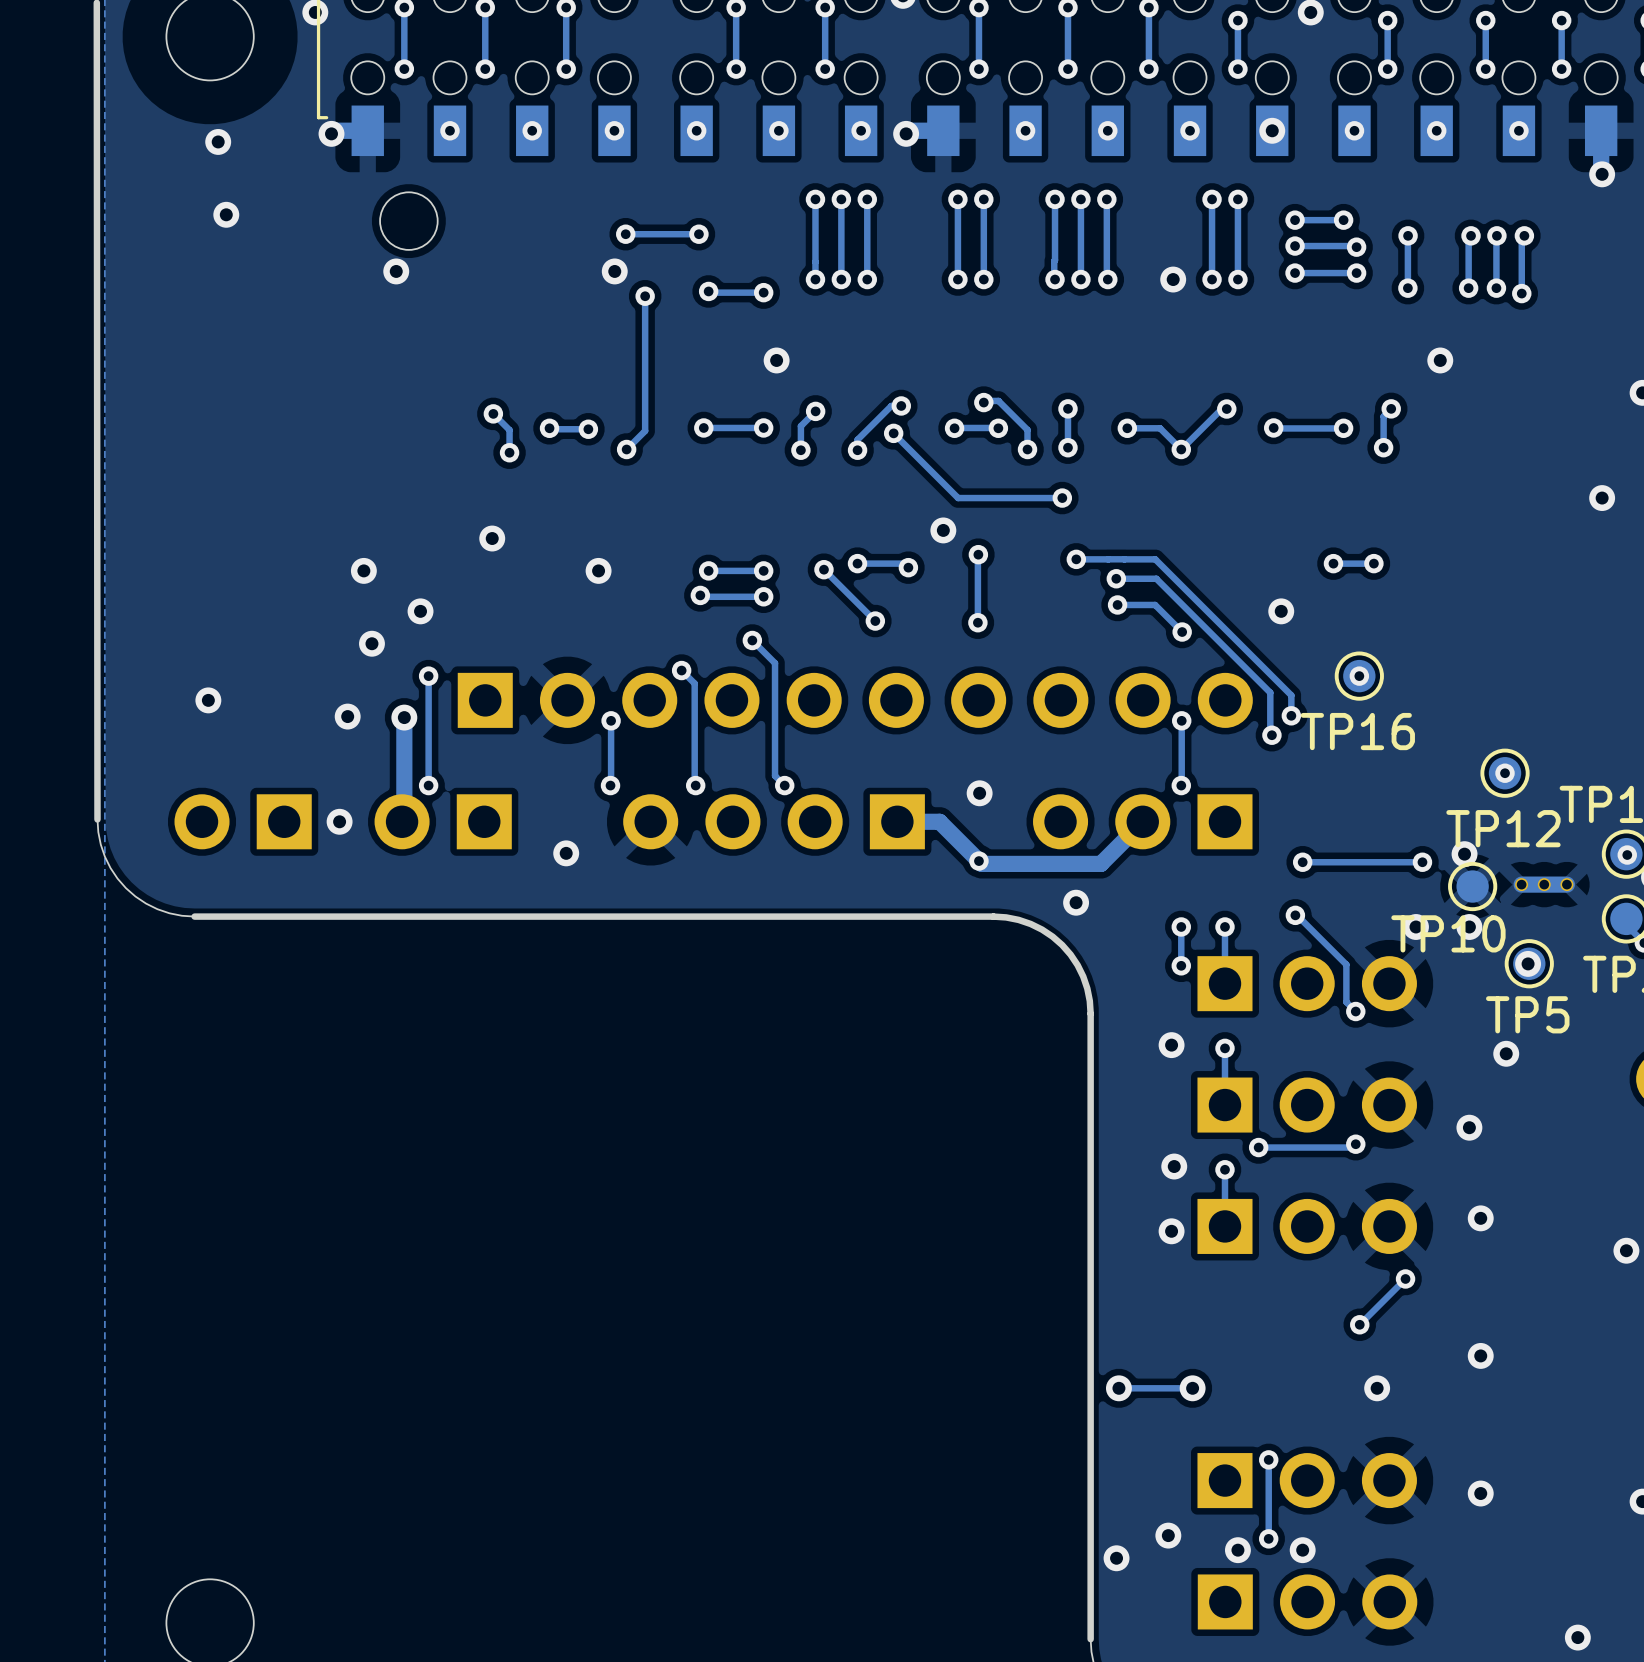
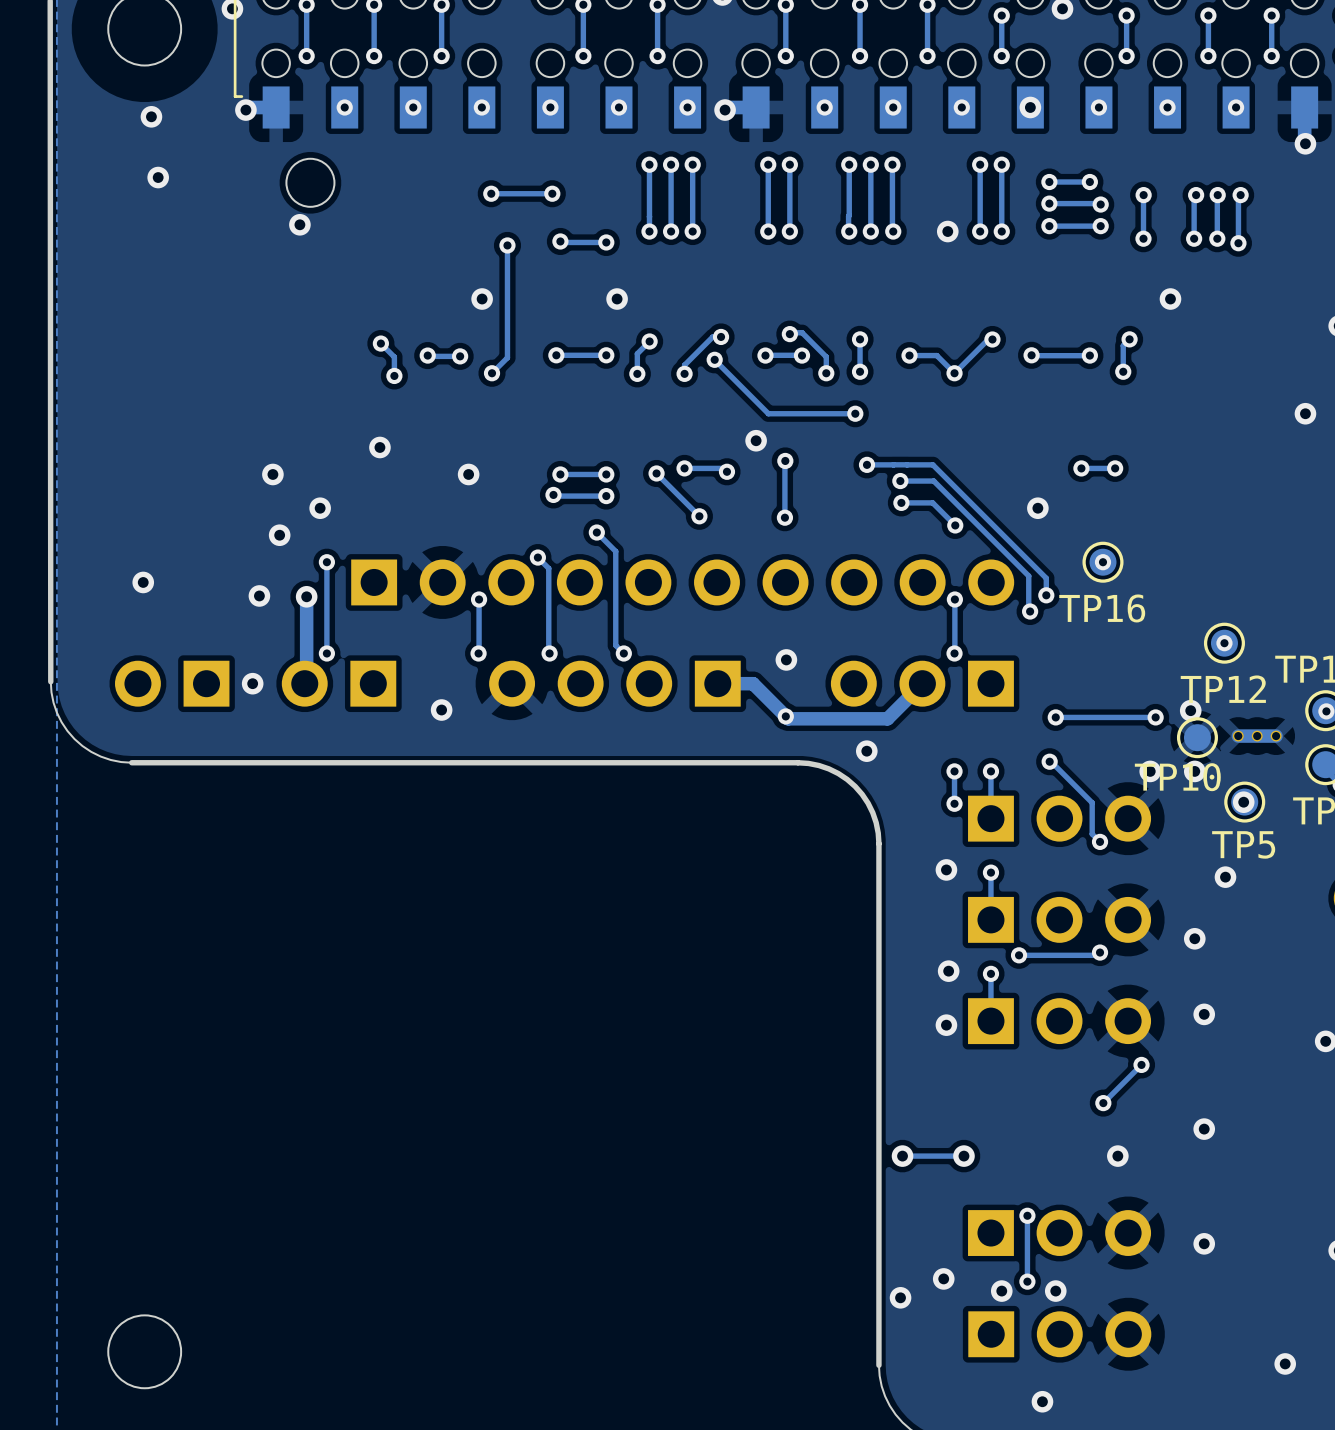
via position: (614, 271) -> (482, 299)

